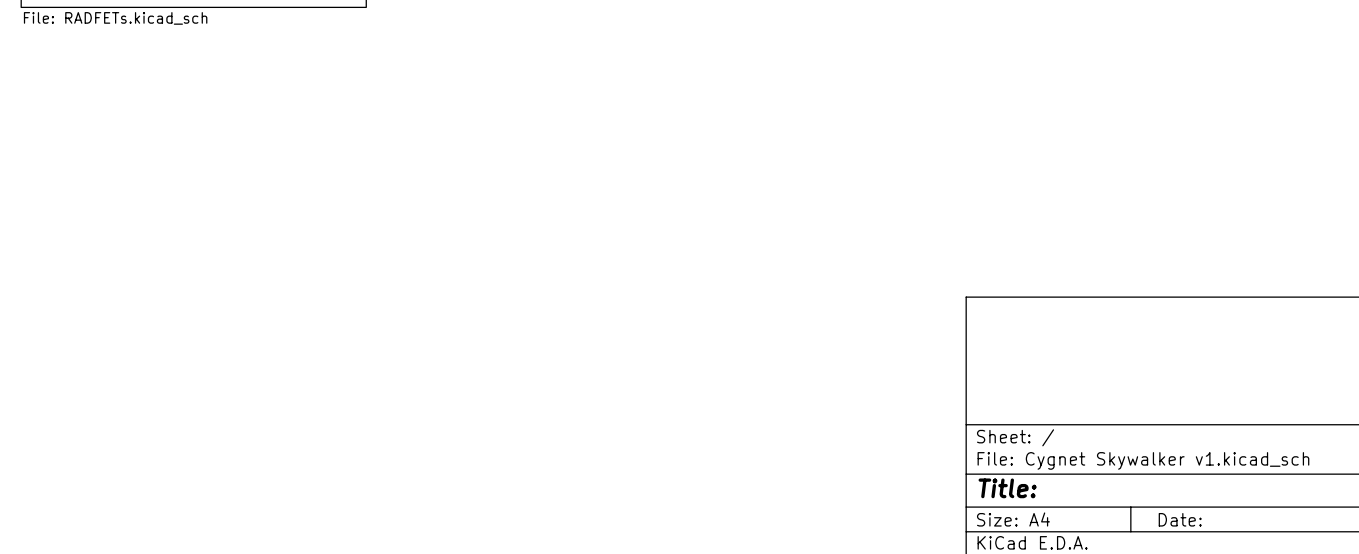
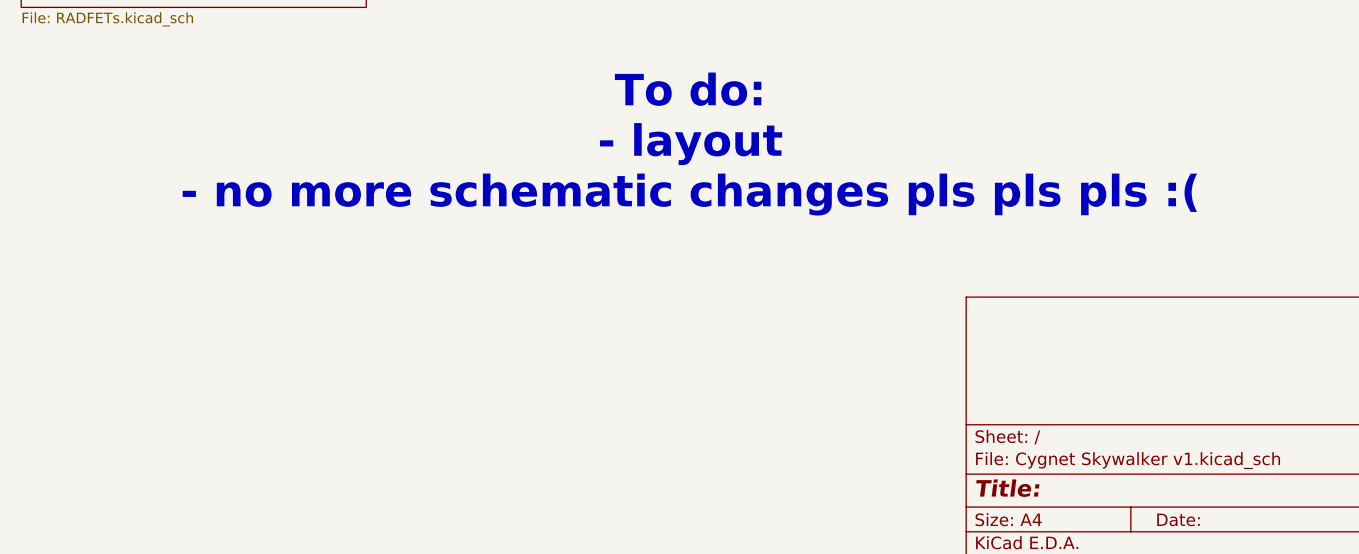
text: none -> To do: (688, 89)
text: none -> - layout (691, 144)
text: none -> - no more schematic changes pls pls pls :( (689, 194)

